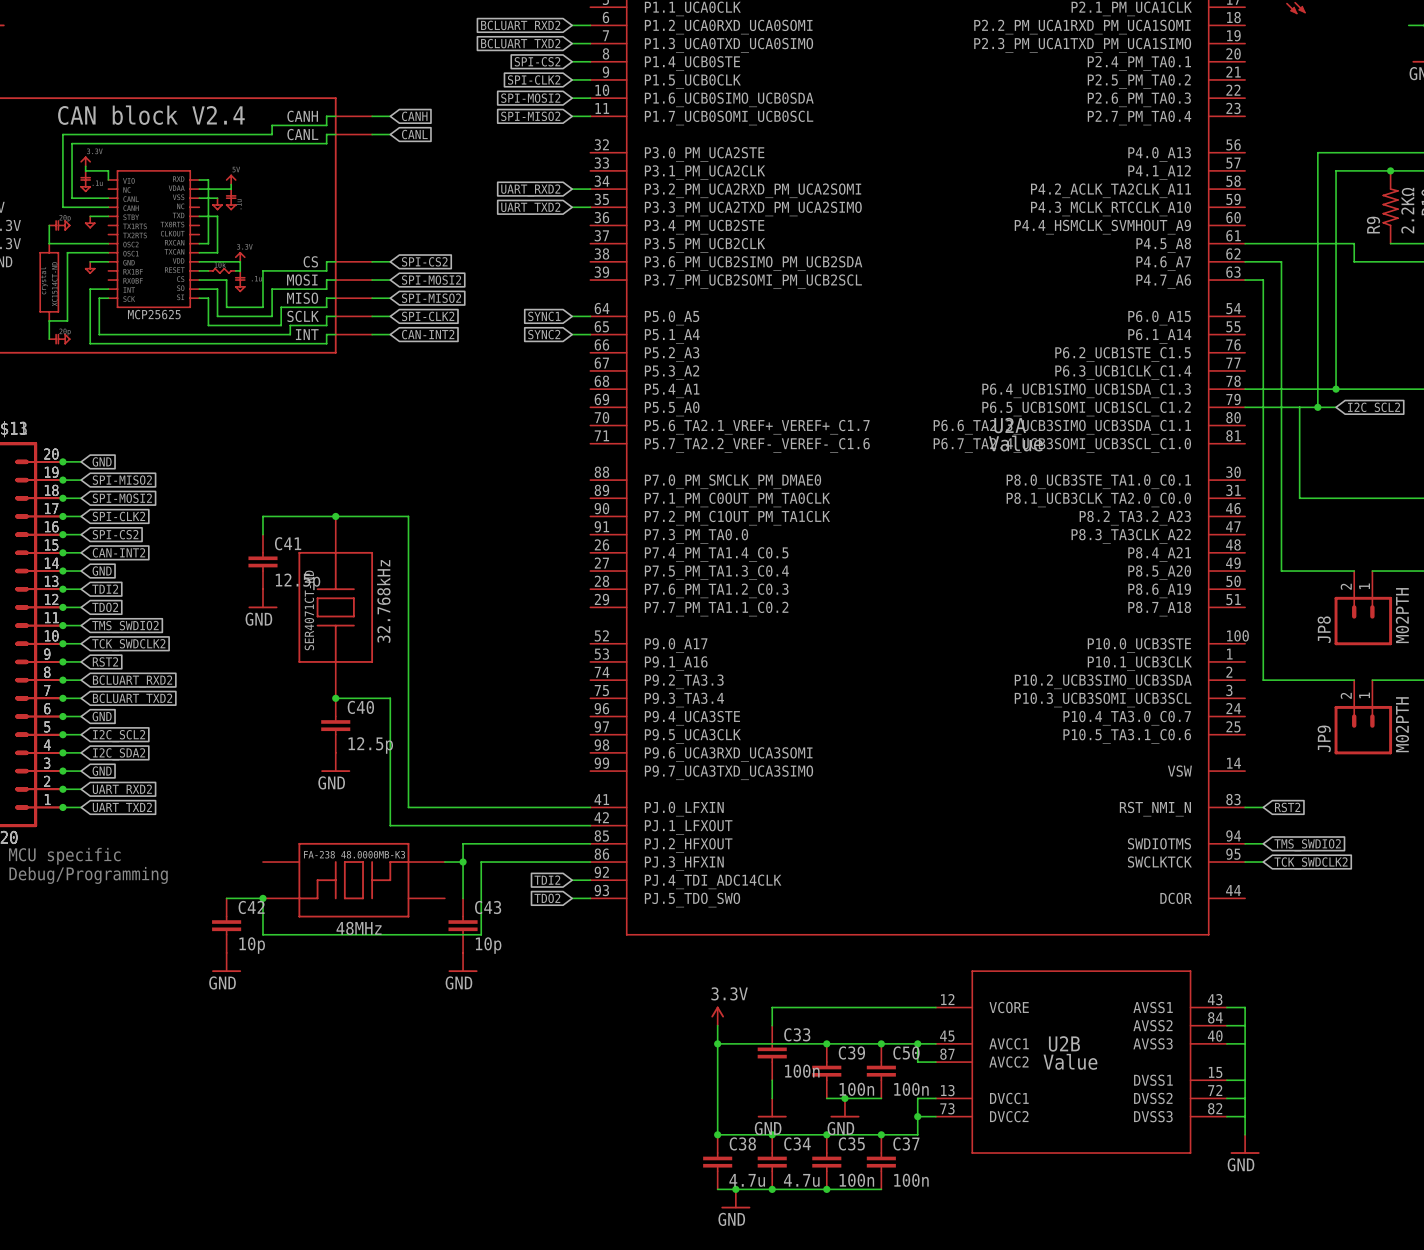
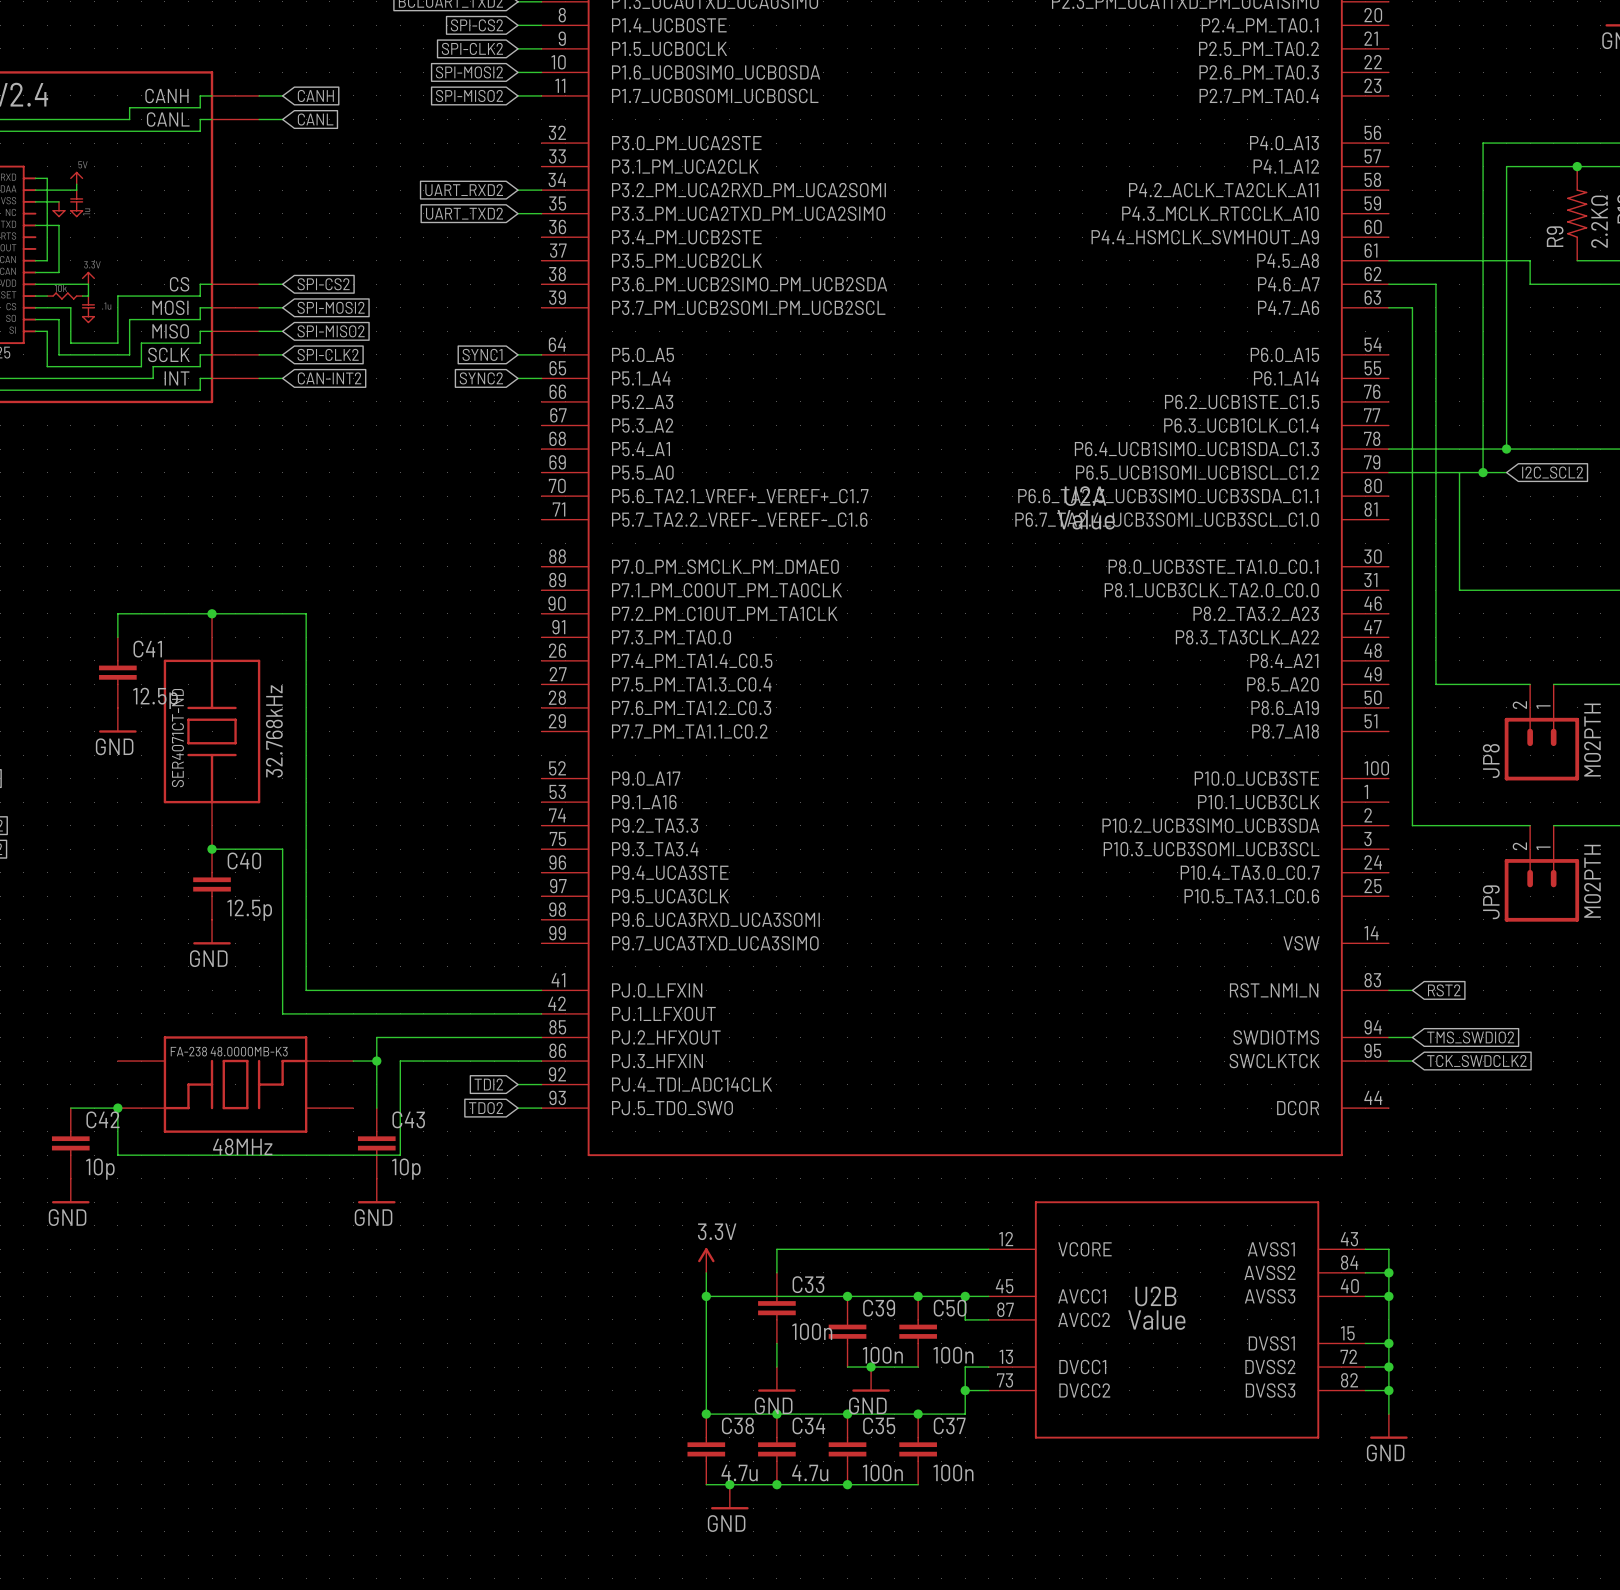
junction: none -> (1388, 1272)
junction: none -> (1388, 1296)
junction: none -> (1388, 1343)
junction: none -> (1388, 1367)
junction: none -> (1388, 1390)

